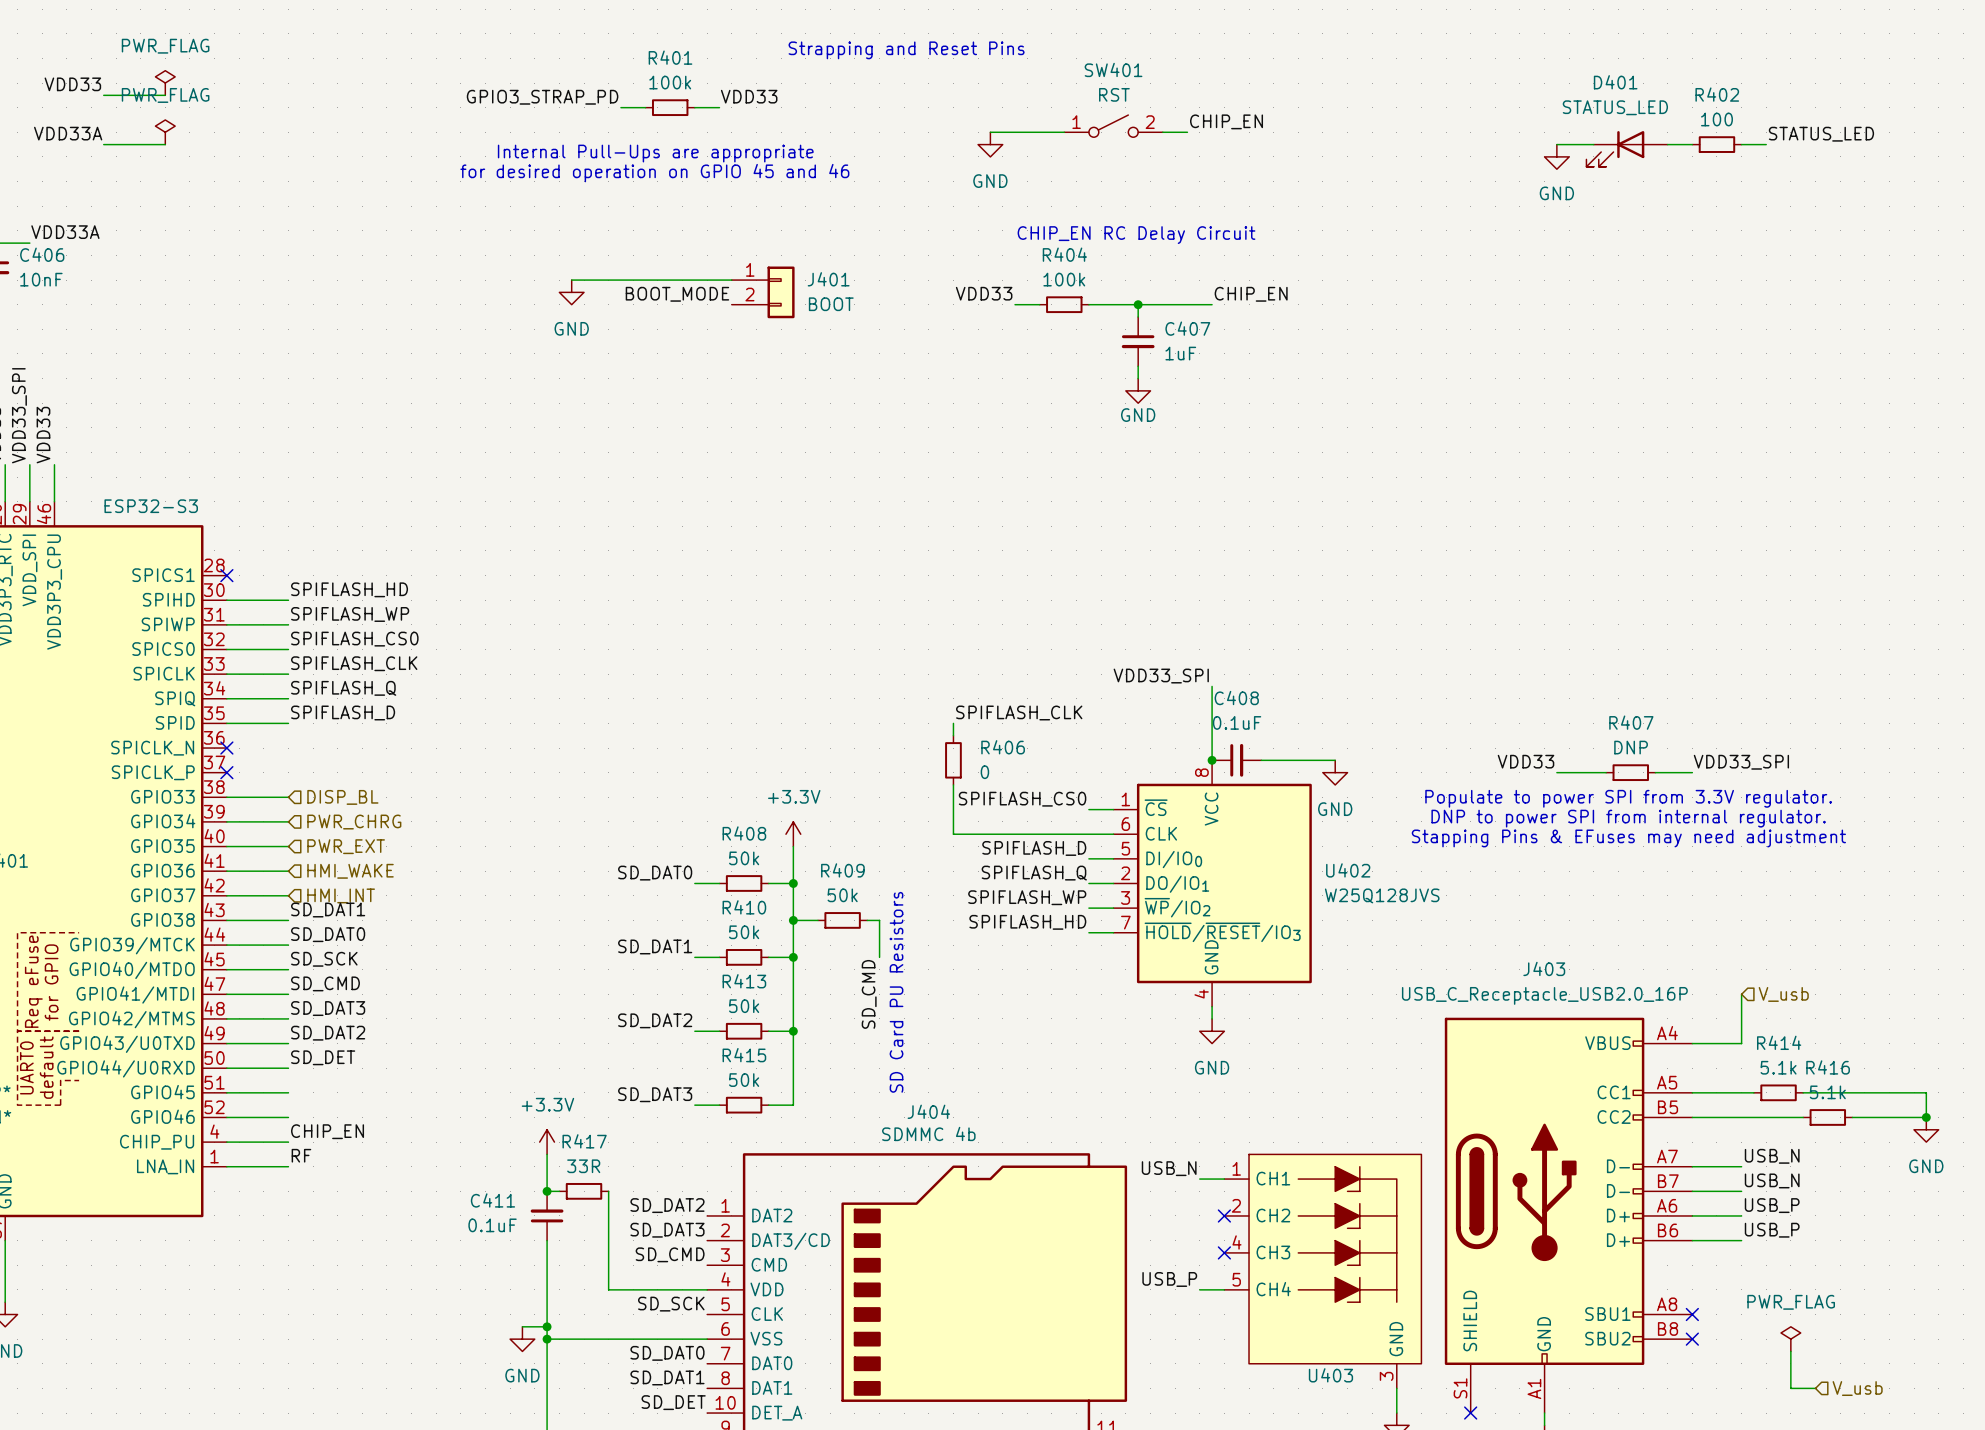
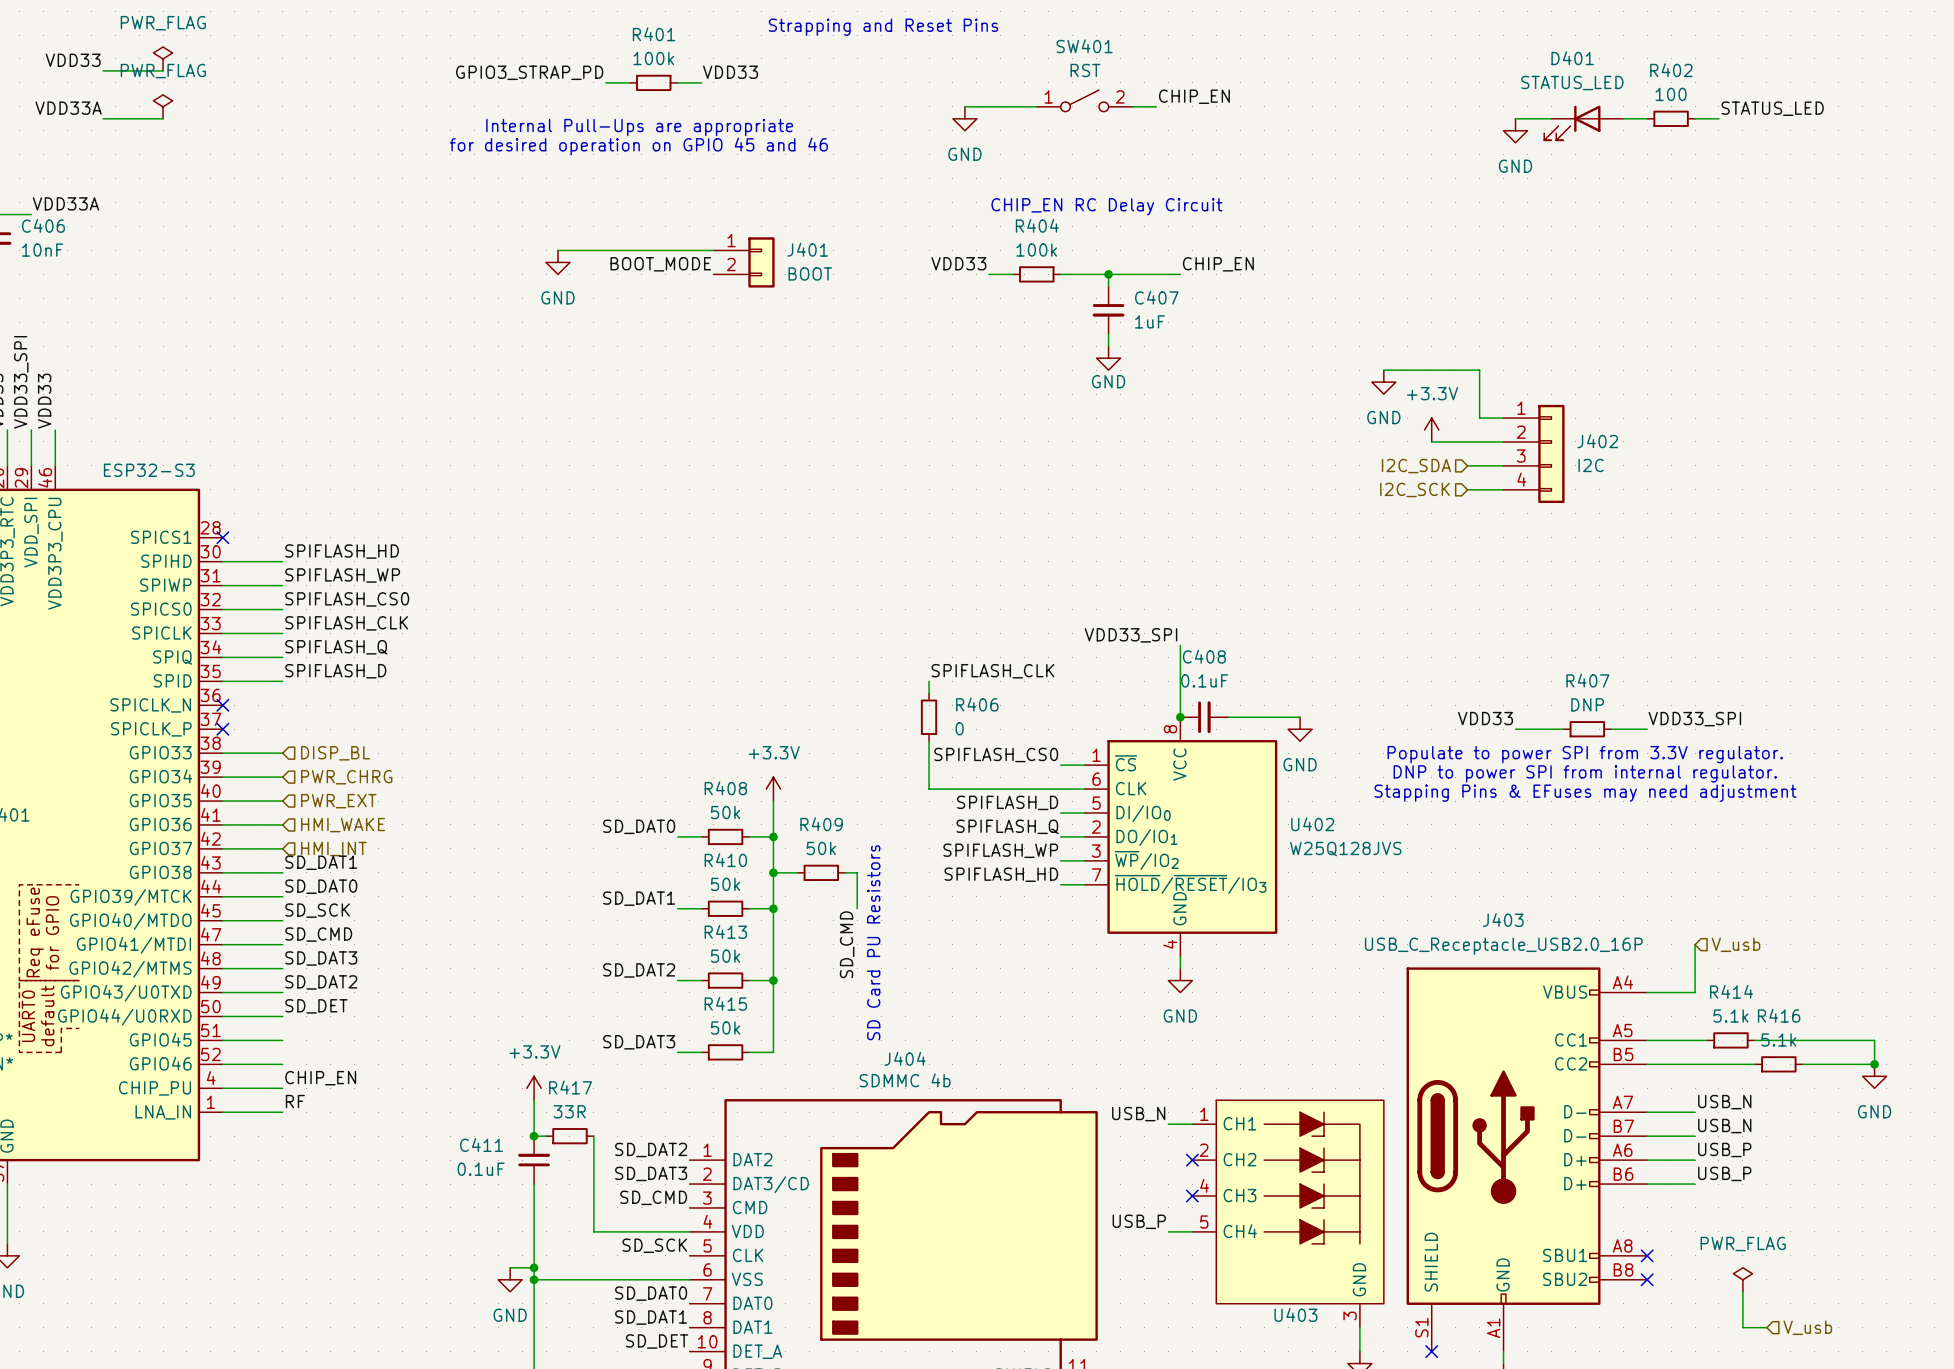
wire: none -> (1383, 370) (1479, 370) (1479, 418) (1503, 418)
power symbol: none -> GND (1383, 382)
power symbol: none -> +3.3V (1431, 430)
wire: none -> (1431, 441) (1503, 441)
J402: none -> I2C (1534, 453)
hierarchical label: none -> I2C_SDA (1416, 466)
wire: none -> (1467, 465) (1503, 465)
hierarchical label: none -> I2C_SCK (1415, 489)
wire: none -> (1467, 489) (1503, 489)

